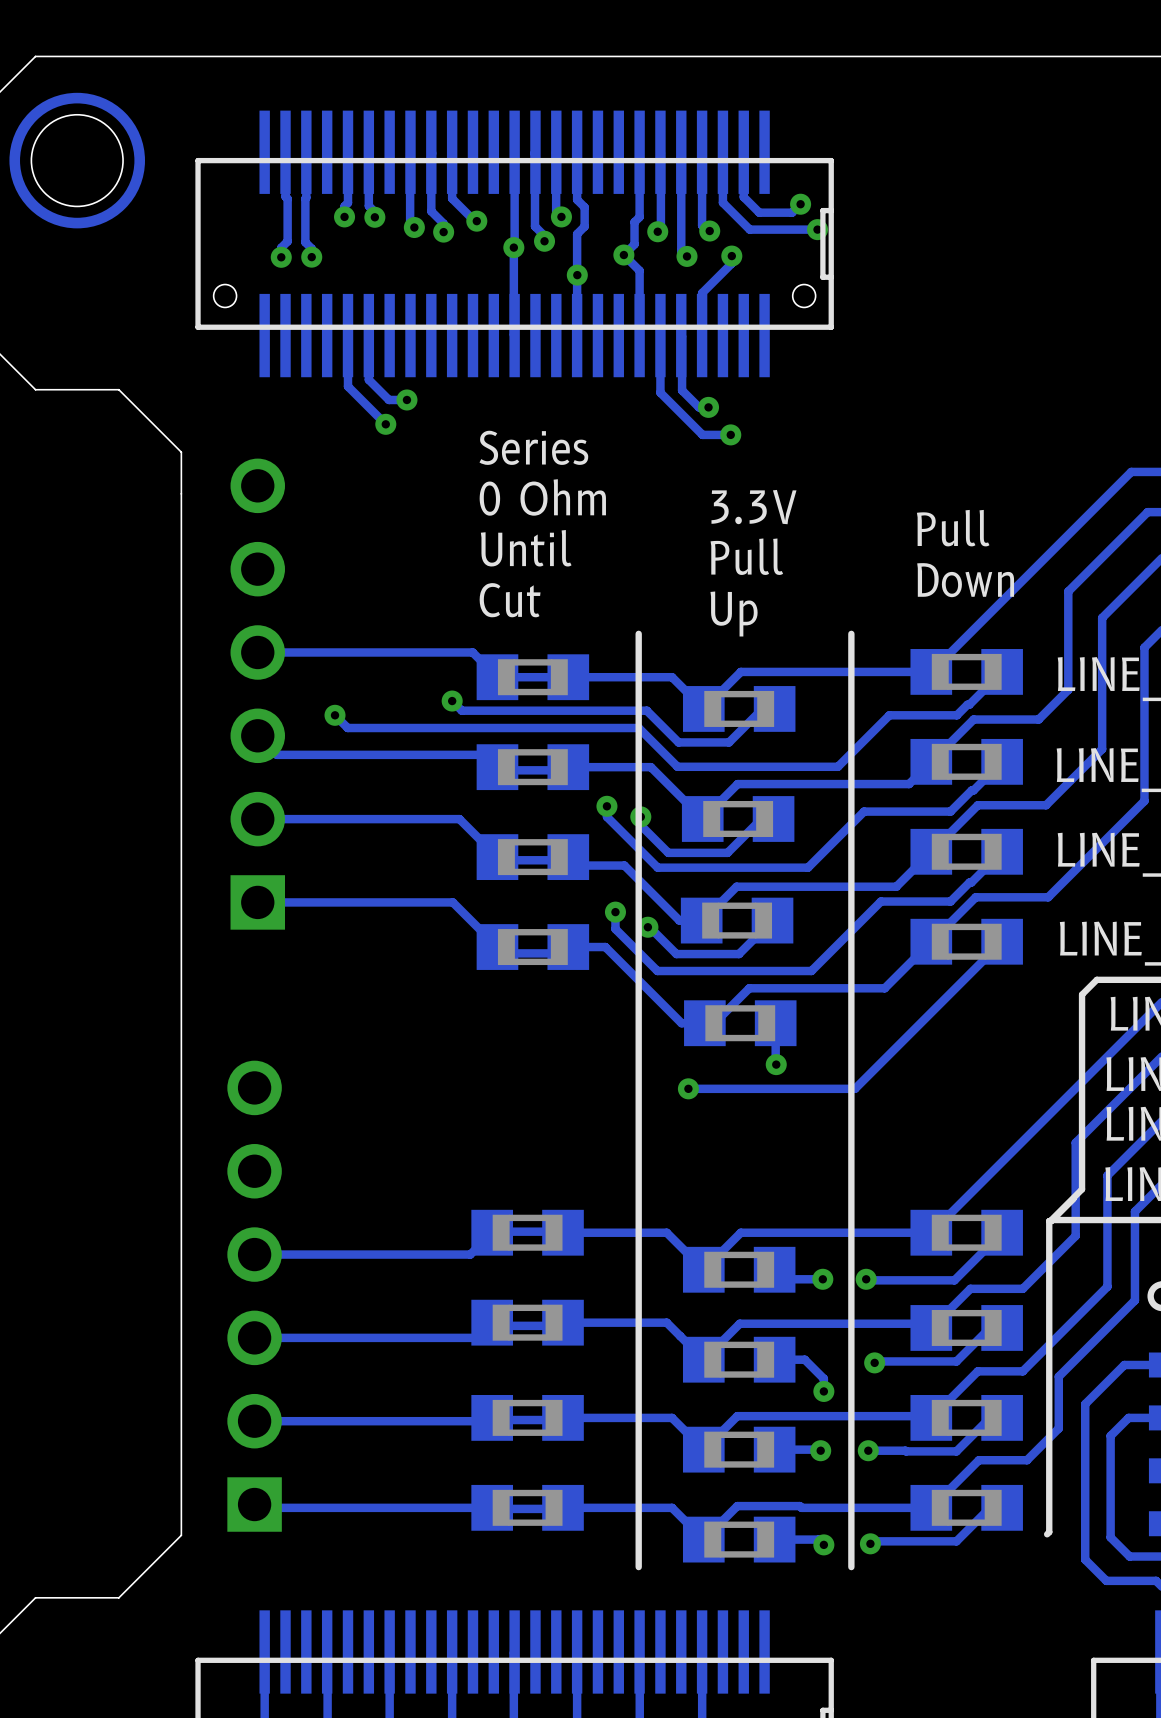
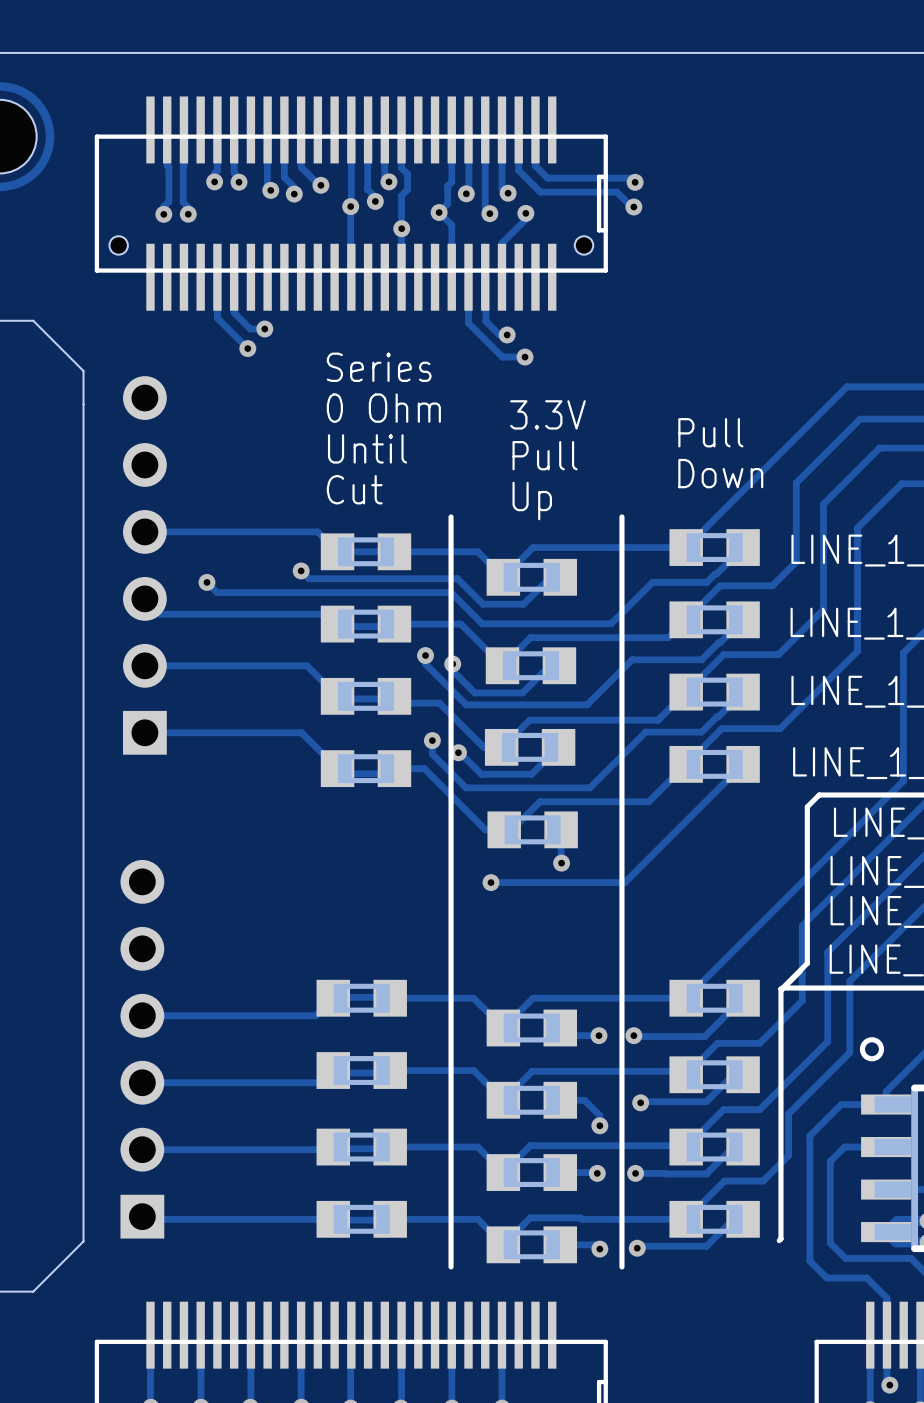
track: (800, 204) (792, 212) (759, 212) -> (635, 182) (630, 178) (547, 178)
via: (800, 204) -> none
via: none -> (635, 182)
track: none -> (594, 192) (616, 192) (633, 206)
via: (817, 229) -> none
via: none -> (633, 206)

